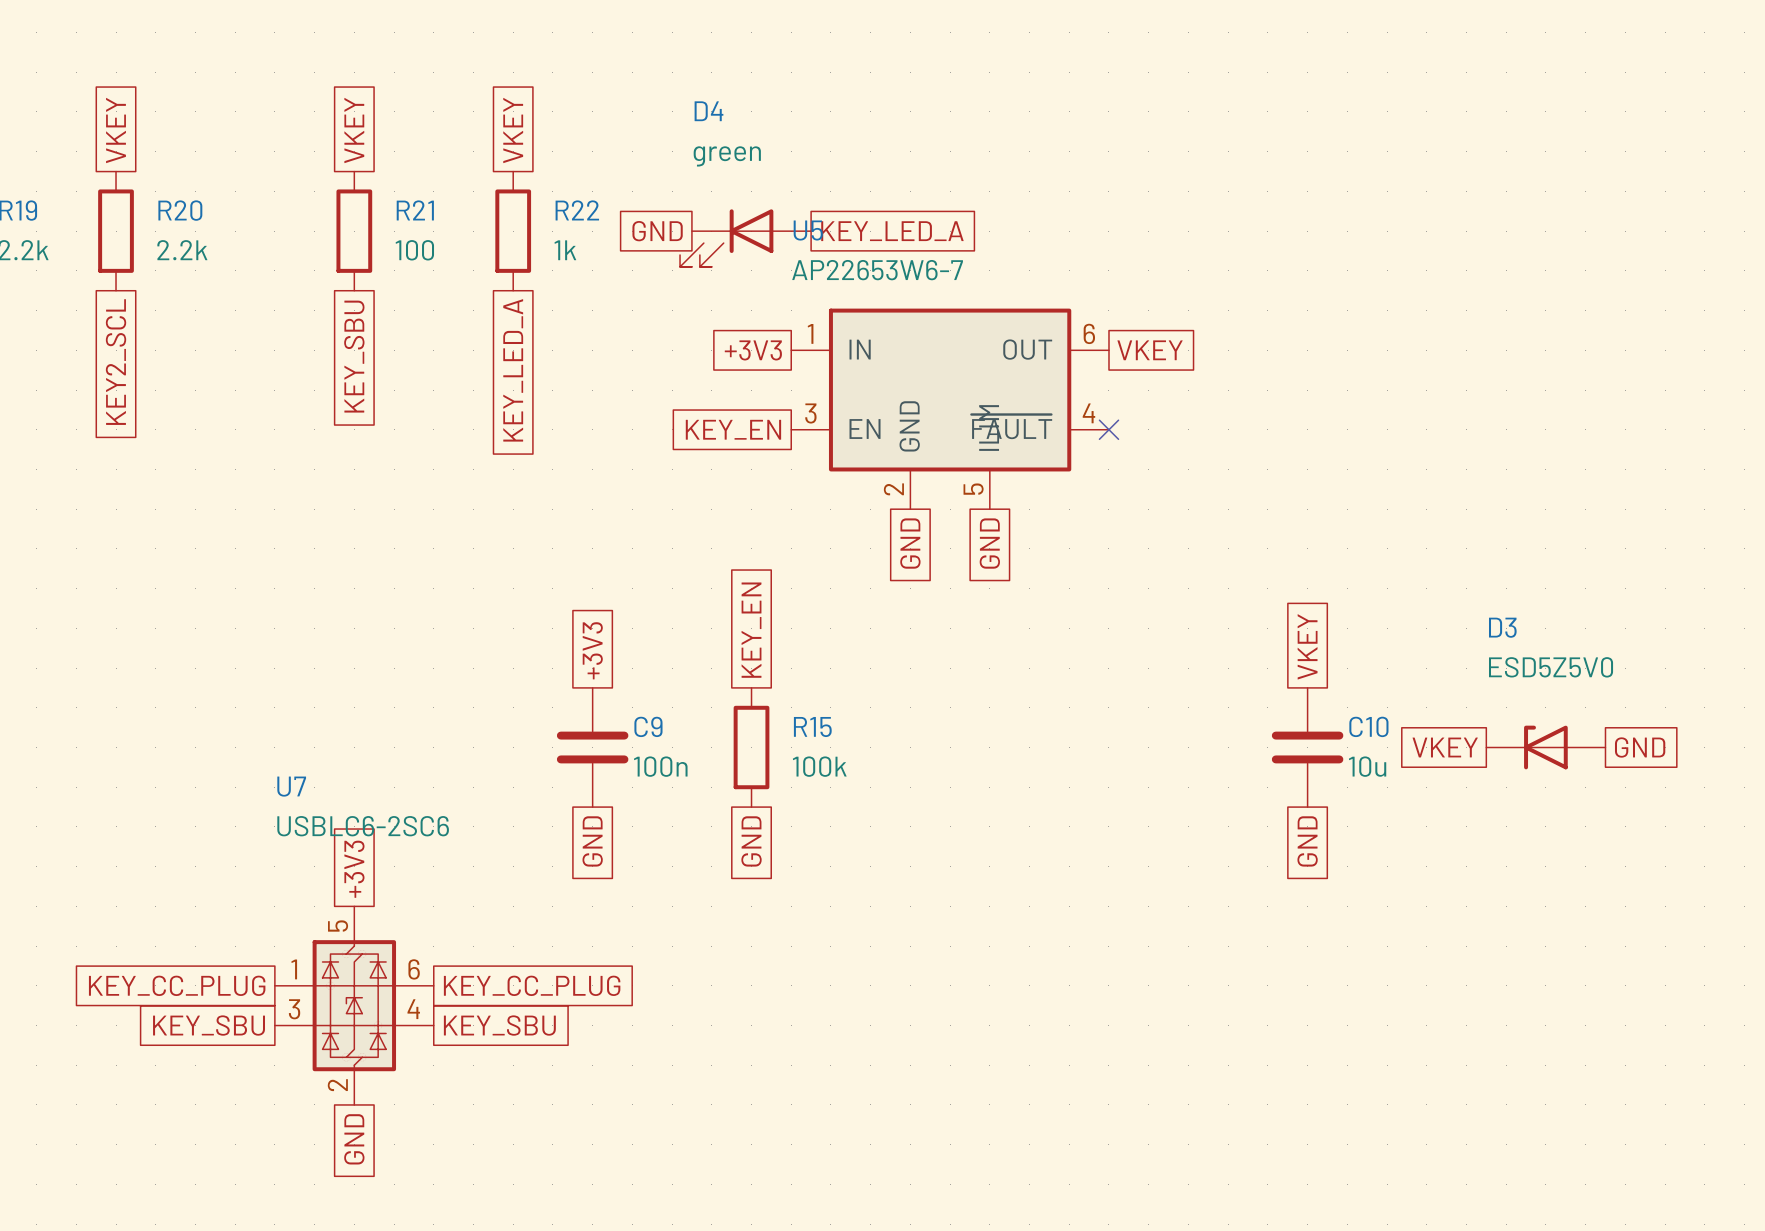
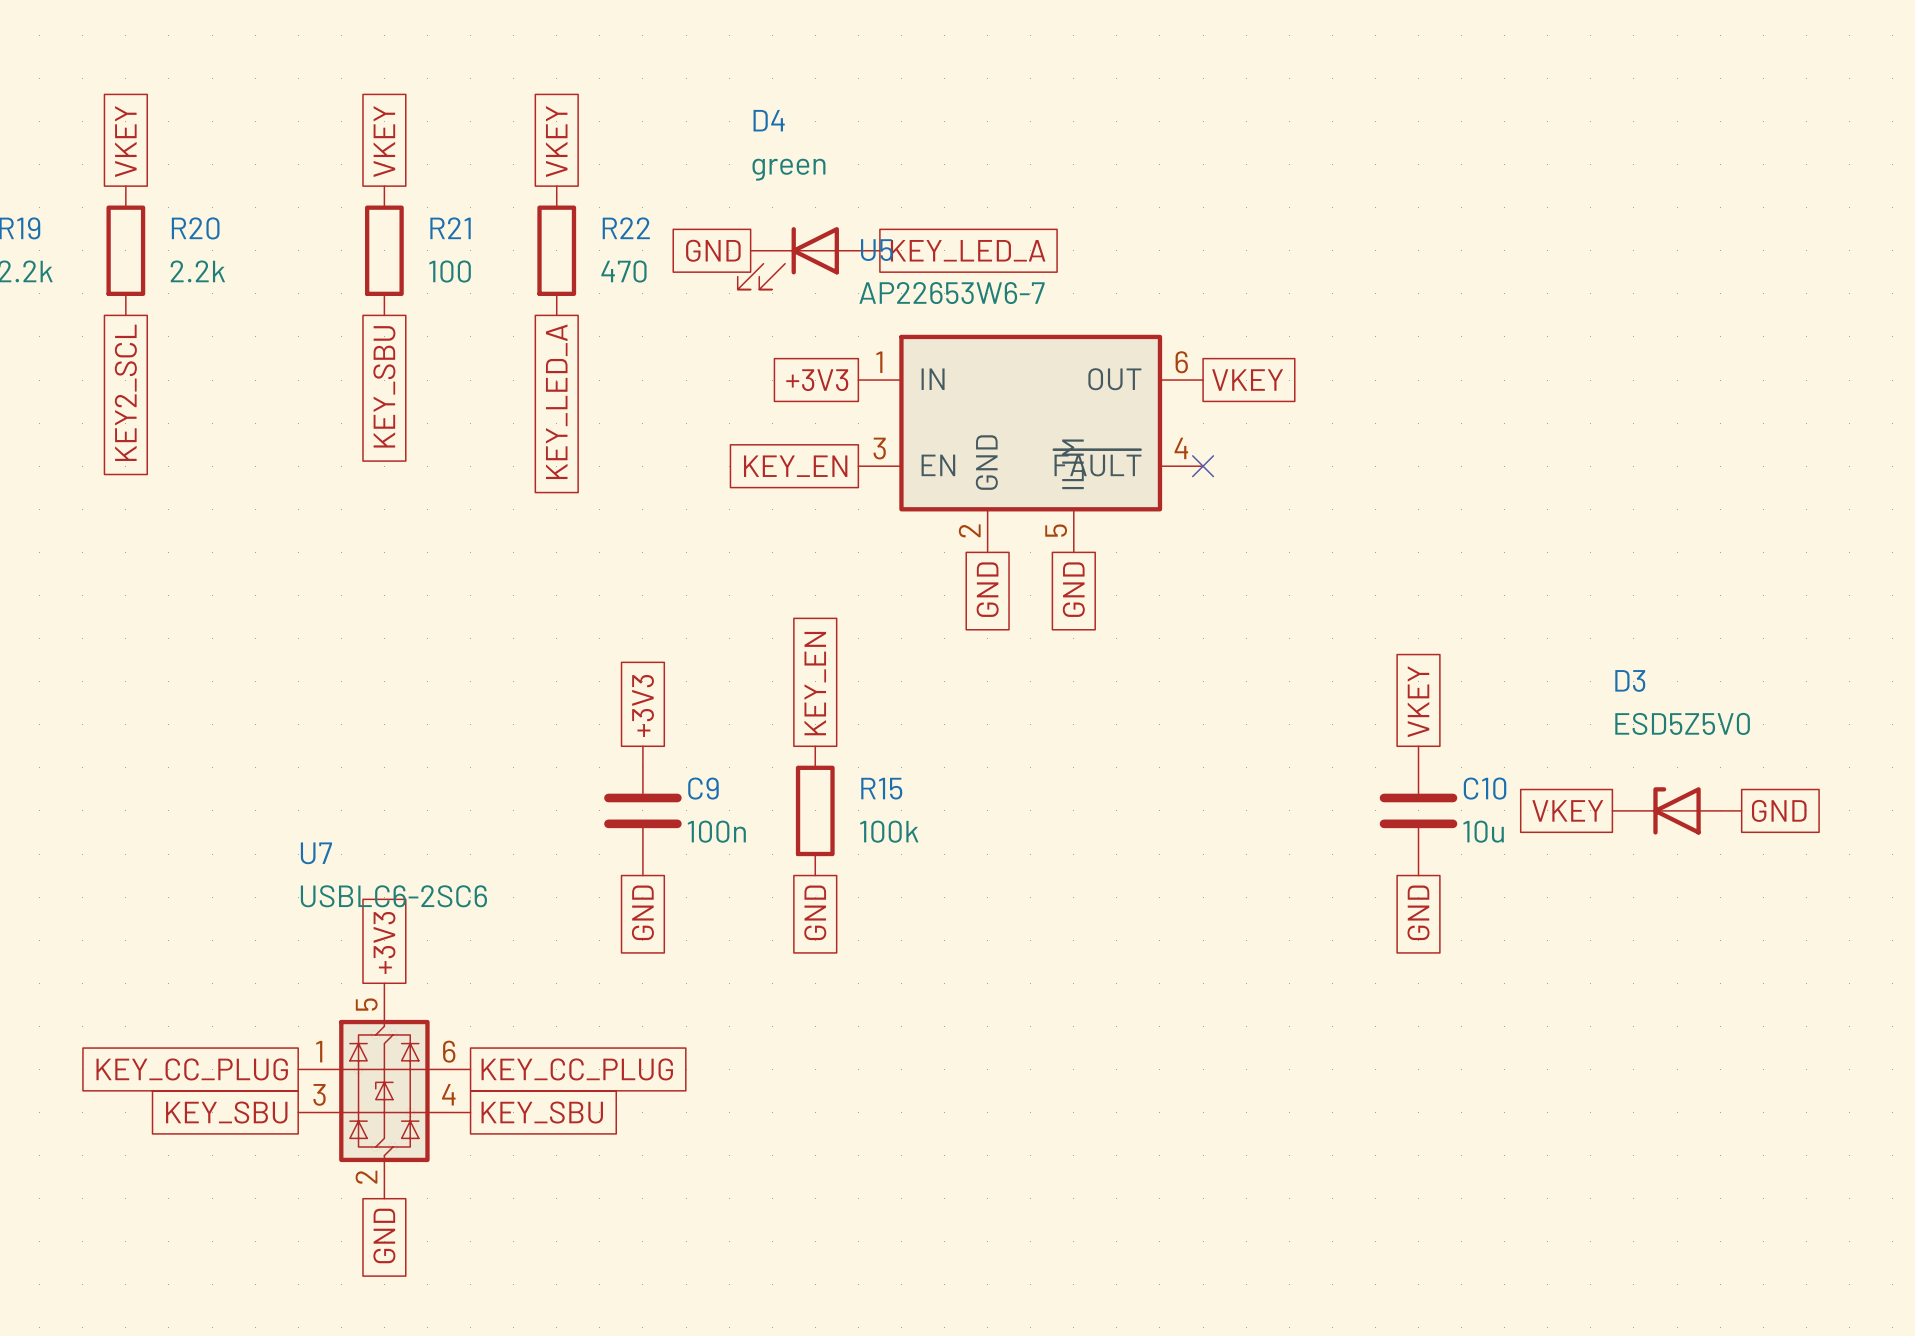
R22 value: 1k (565, 250) -> 470 (623, 271)

